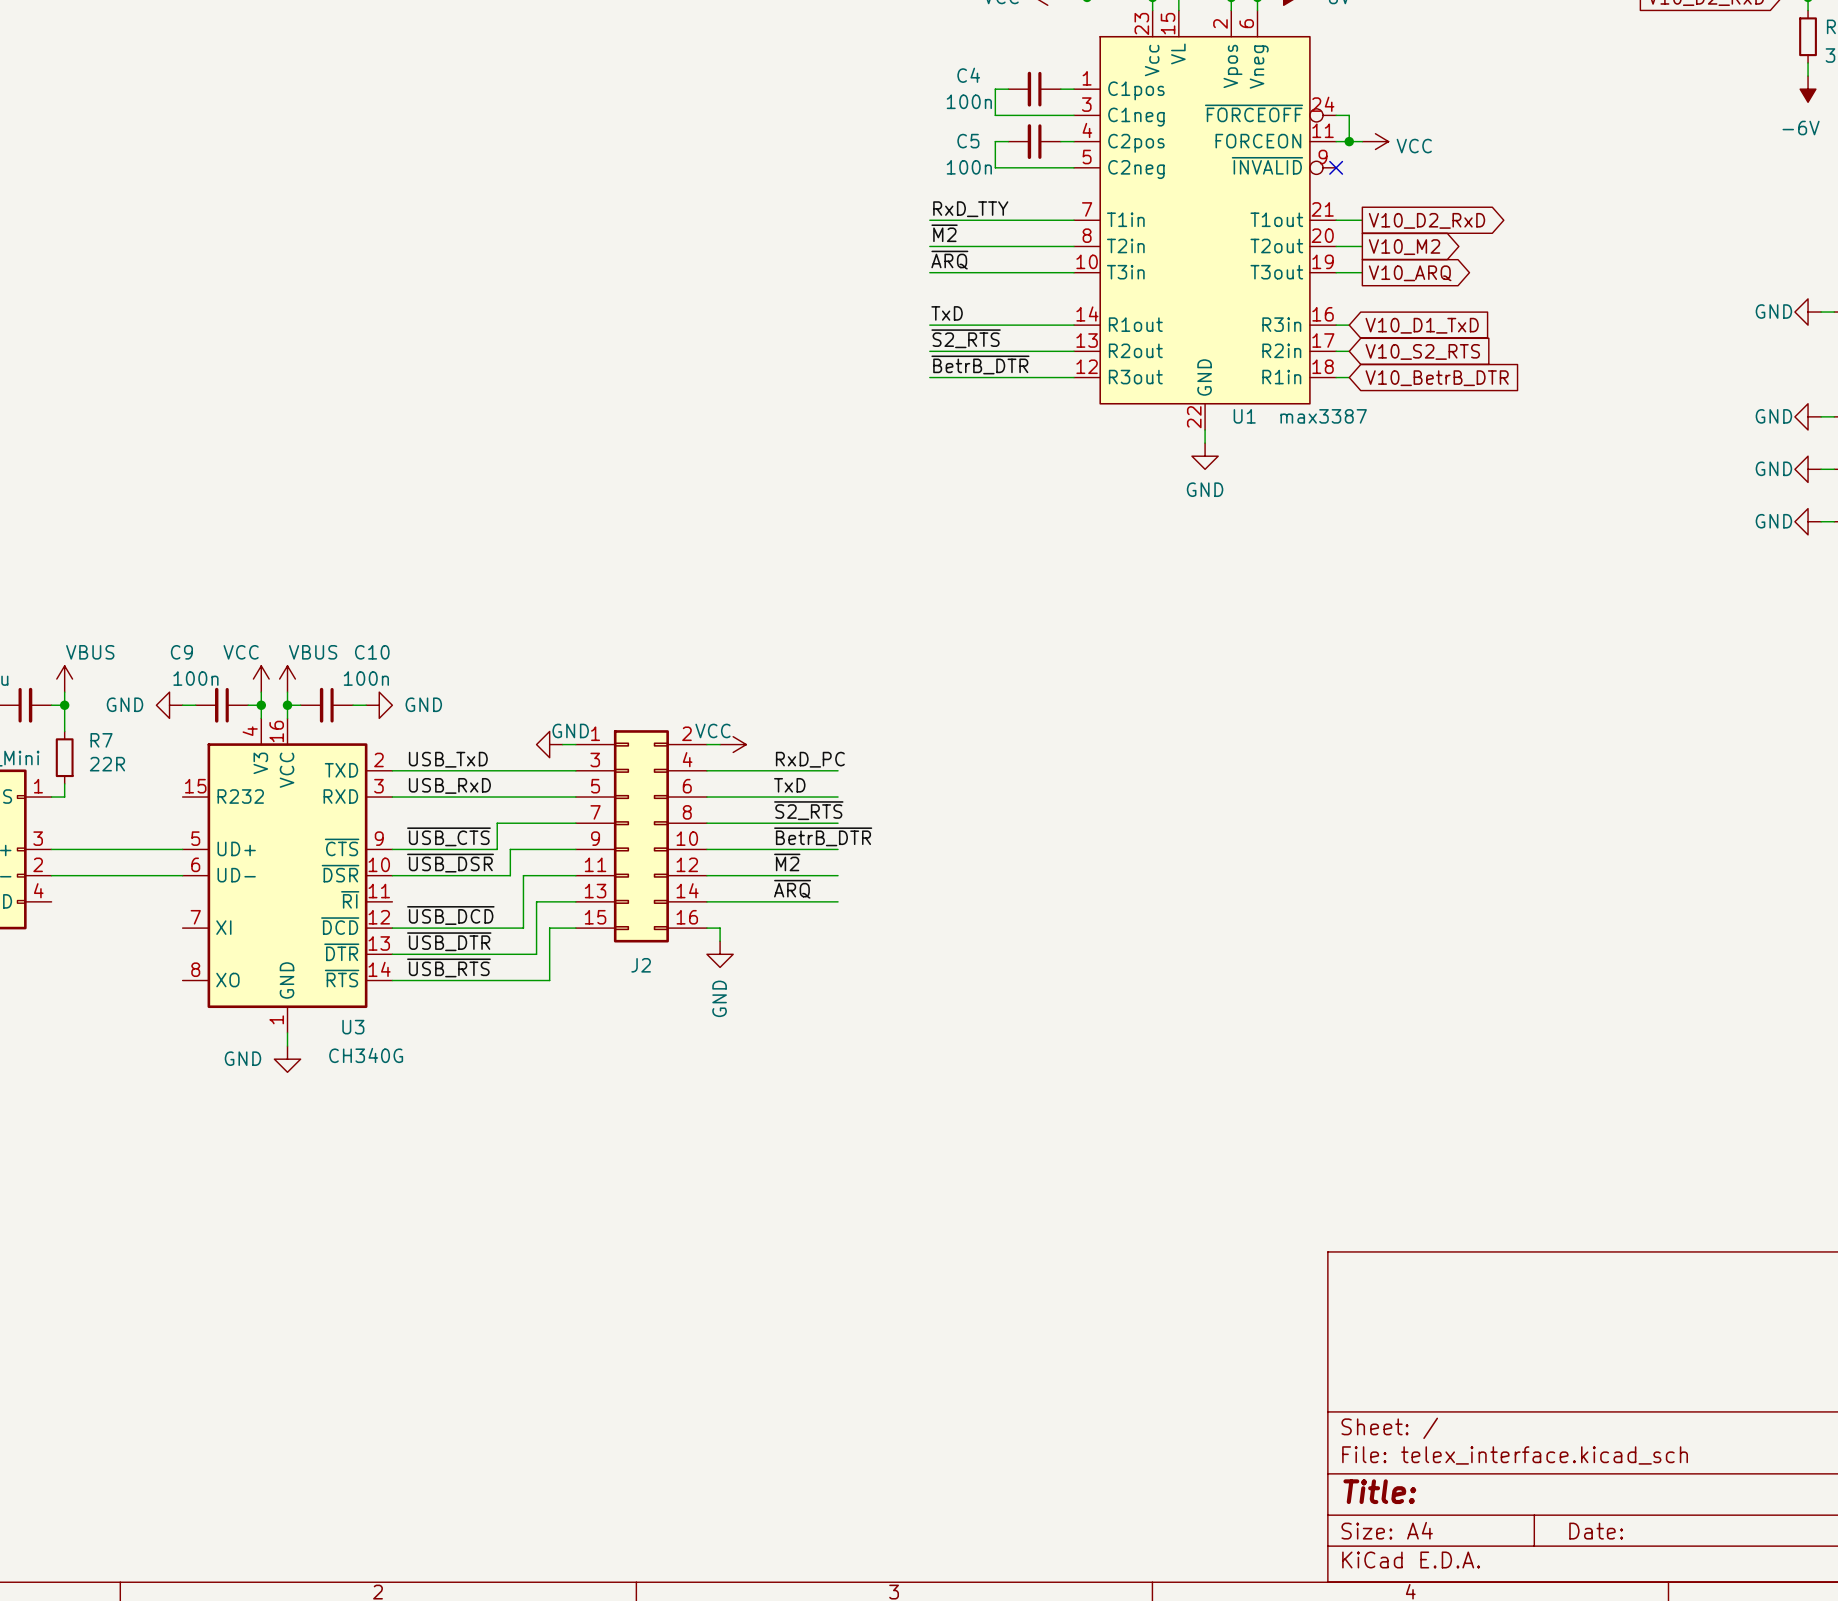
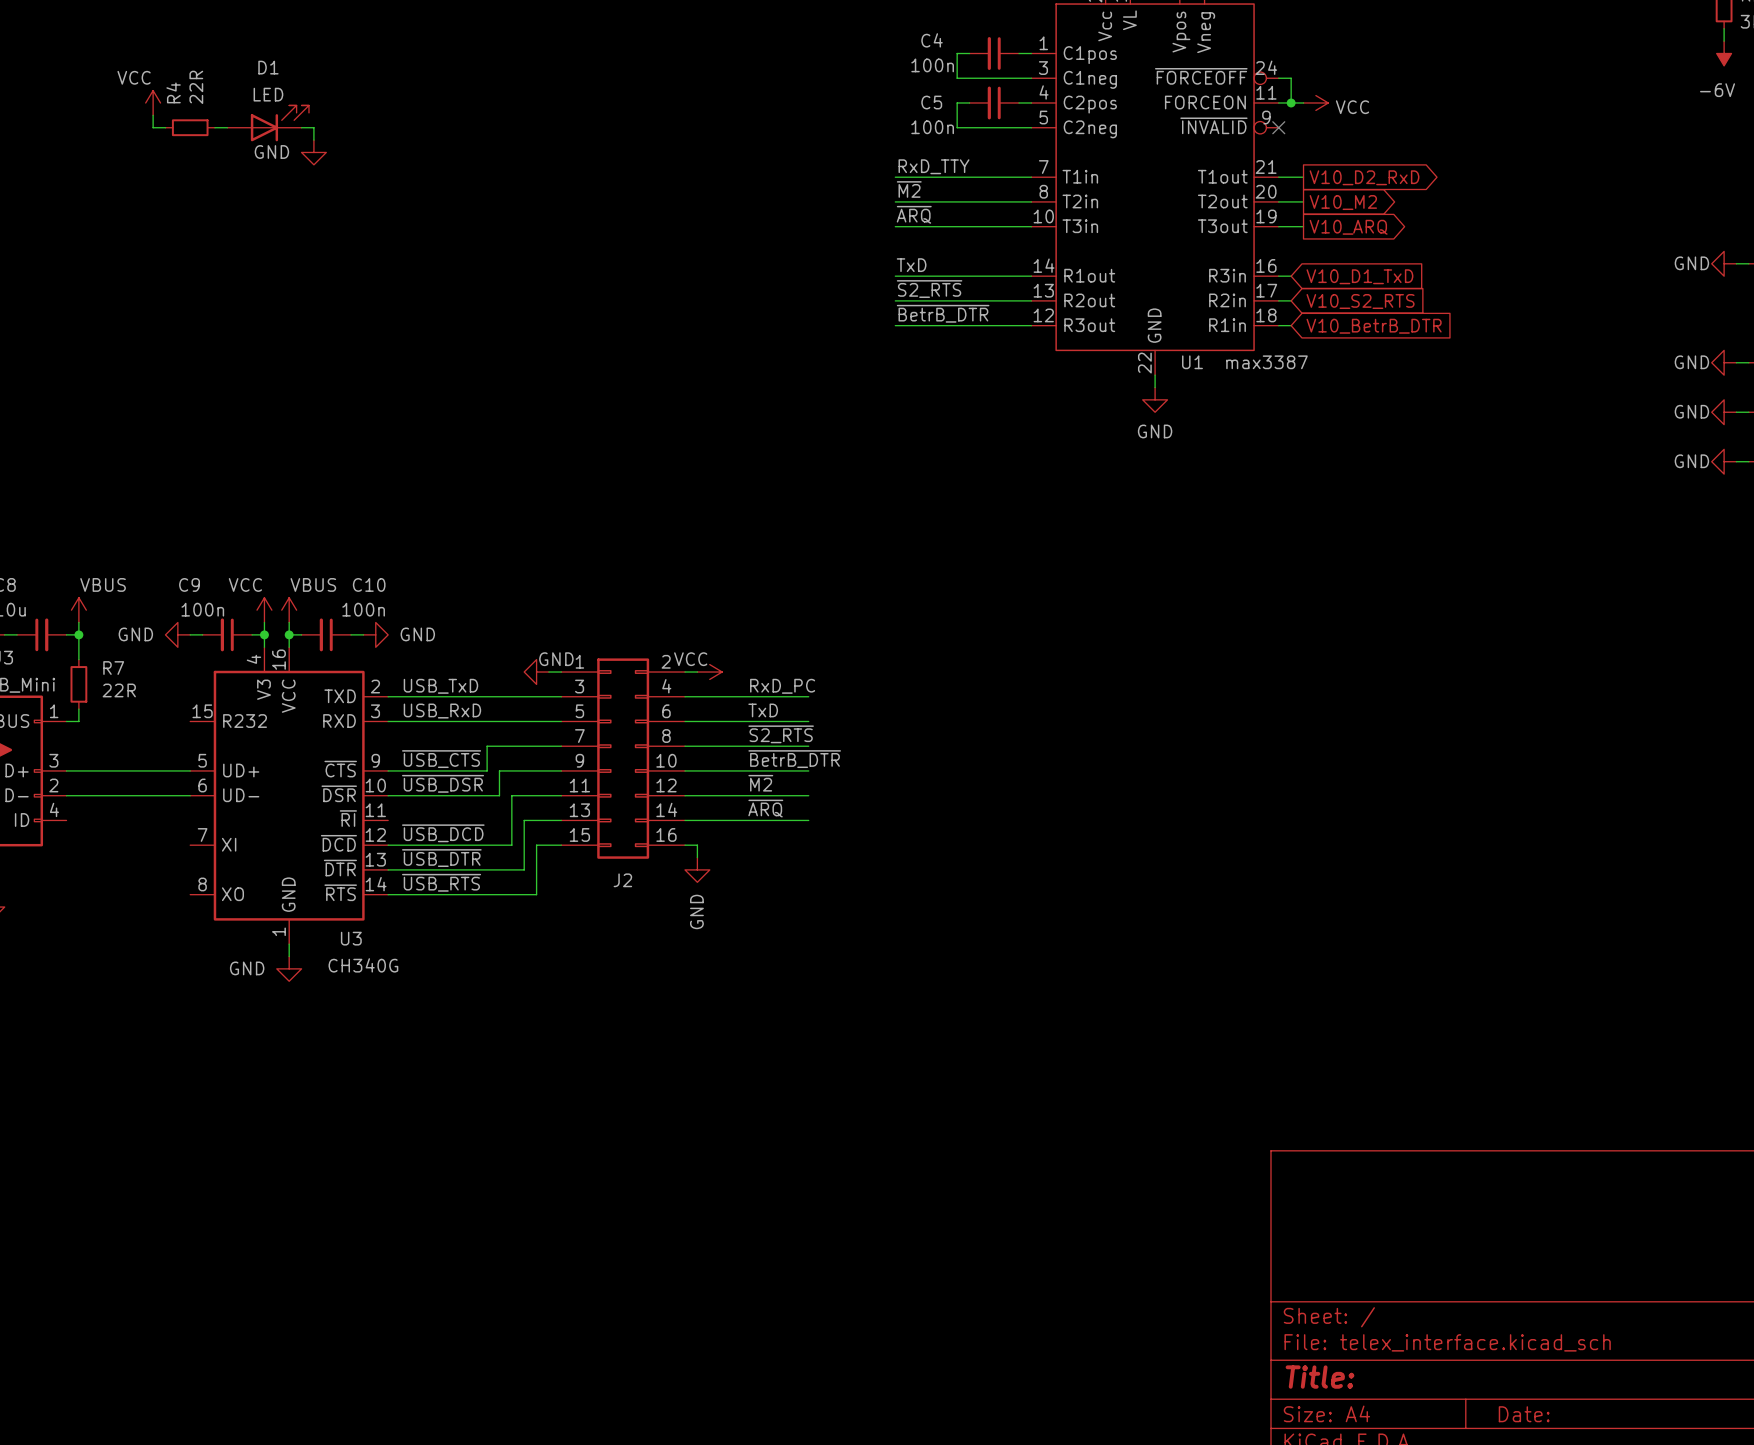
power symbol: none -> VCC (153, 102)
wire: none -> (153, 115) (153, 127) (165, 127)
D1: none -> LED (268, 123)
R4: none -> 22R (190, 127)
wire: none -> (214, 127) (227, 127)
wire: none -> (301, 127) (313, 127) (313, 140)
power symbol: none -> GND (313, 152)

